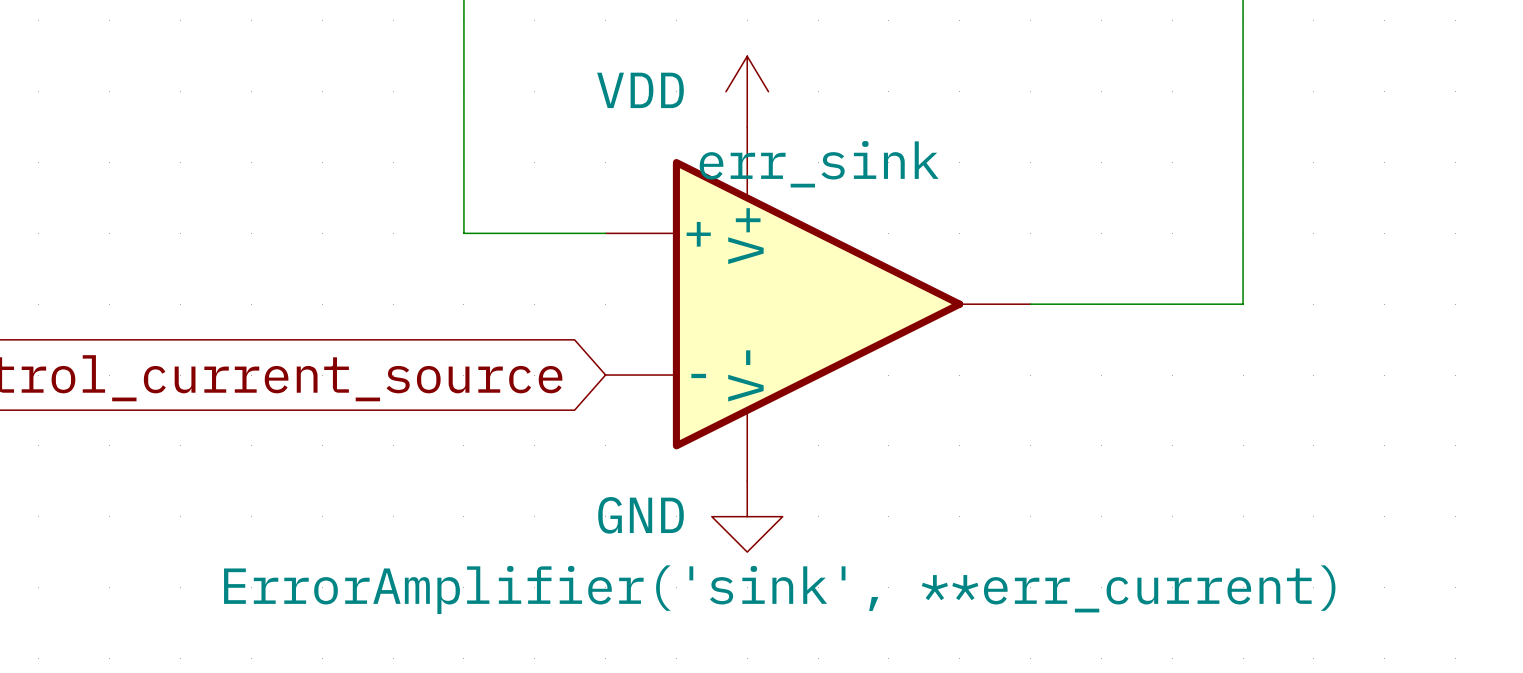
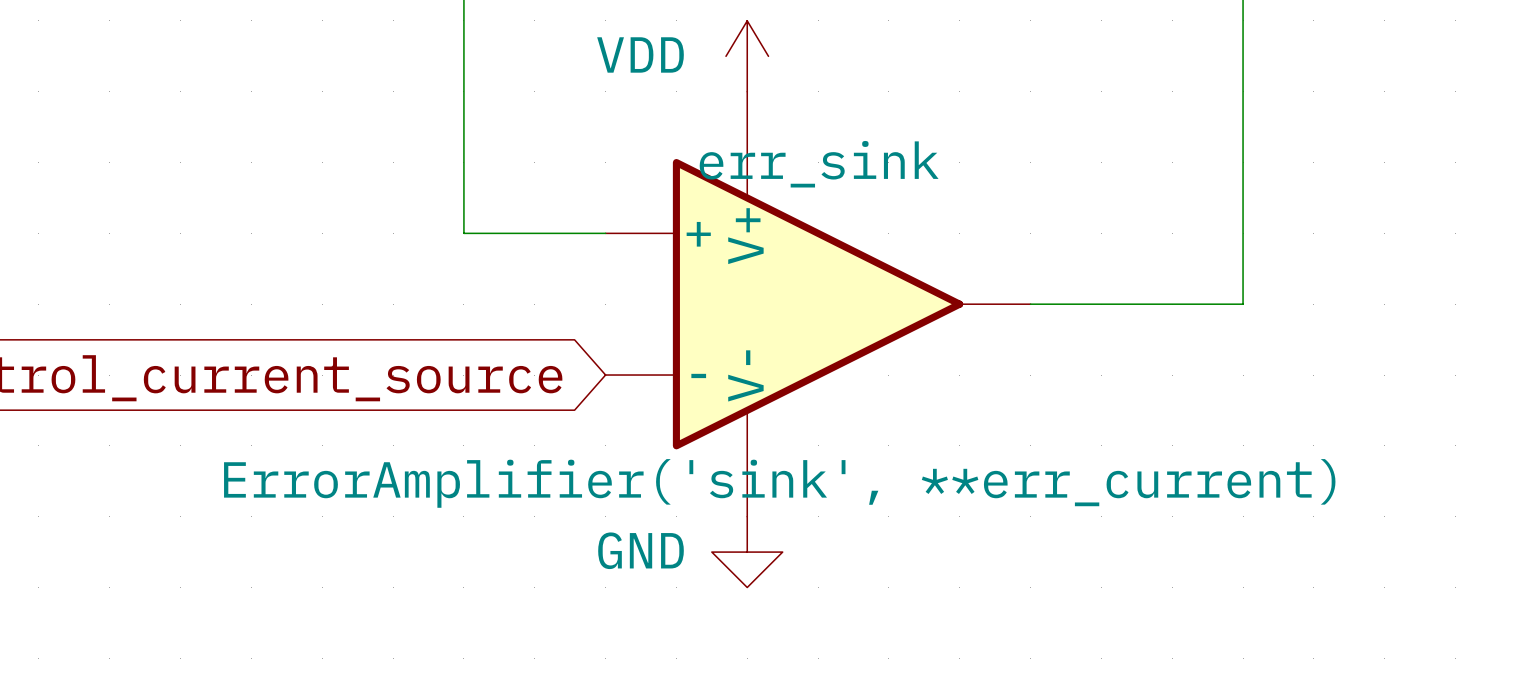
power symbol position: VDD (747, 91) -> VDD (747, 56)
err_sink symbol: [605, 127, 1031, 482] -> [605, 91, 1031, 517]
power symbol position: GND (747, 516) -> GND (747, 552)
err_sink value position: ErrorAmplifier('sink', **err_current) (779, 589) -> ErrorAmplifier('sink', **err_current) (779, 483)

